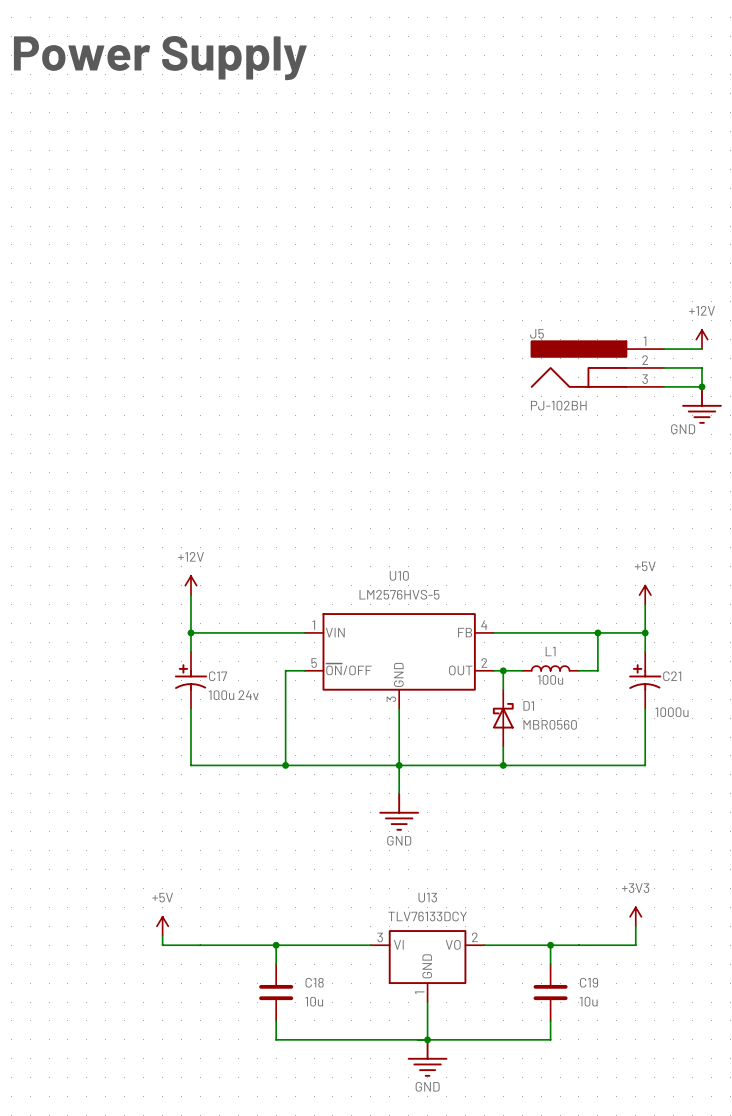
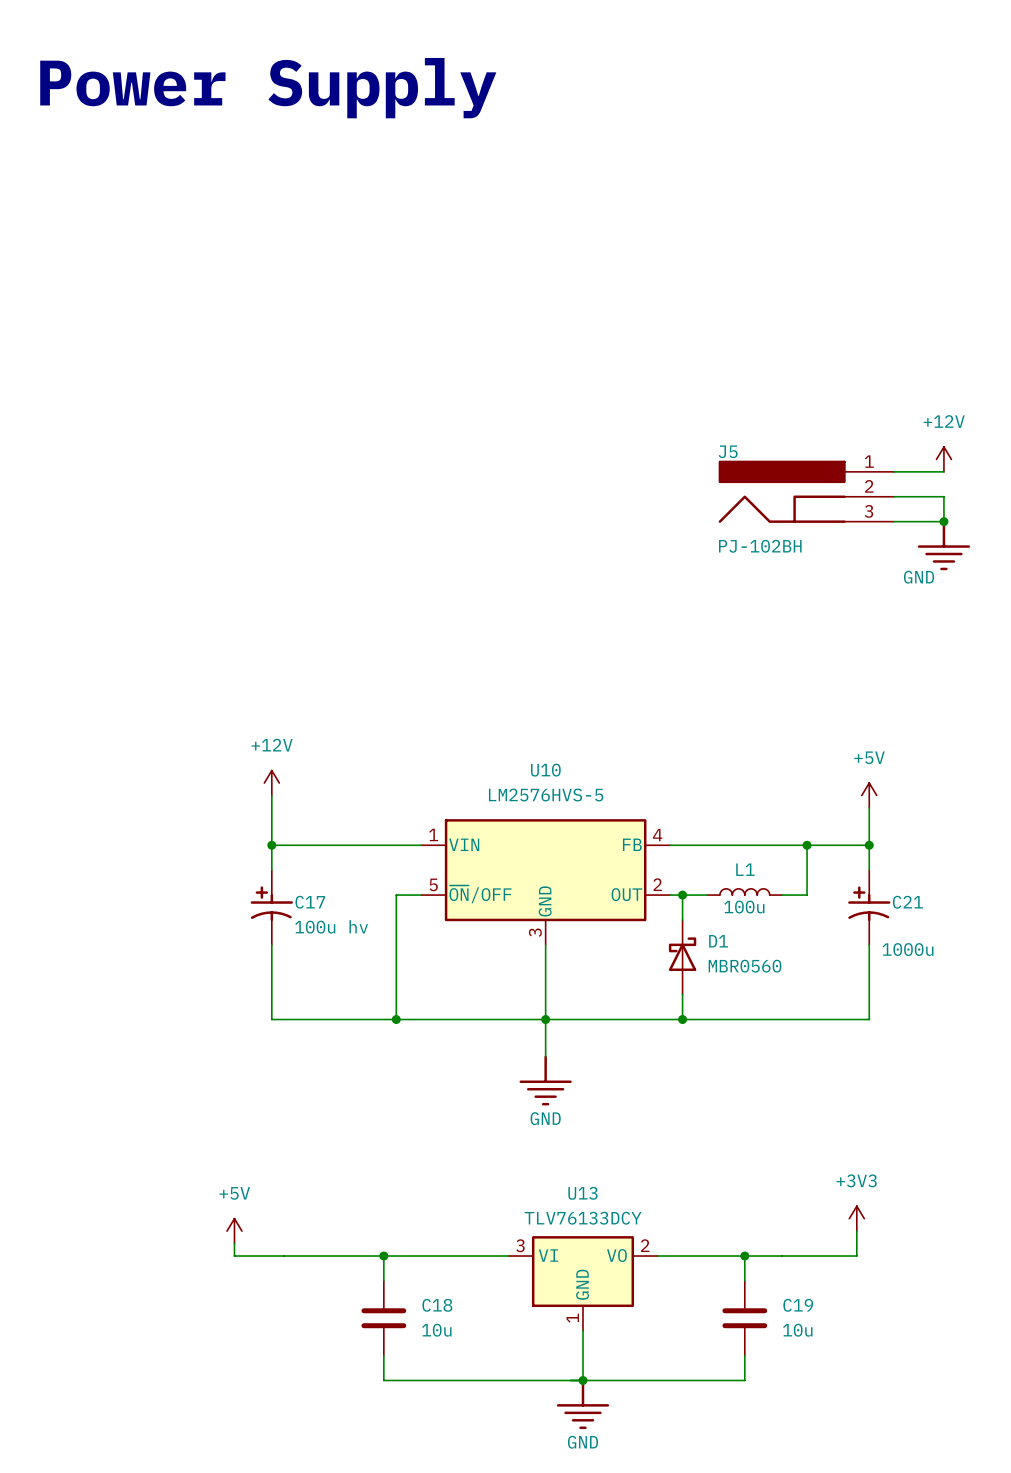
C17 value: 100u 24v (233, 695) -> 100u hv (331, 926)

